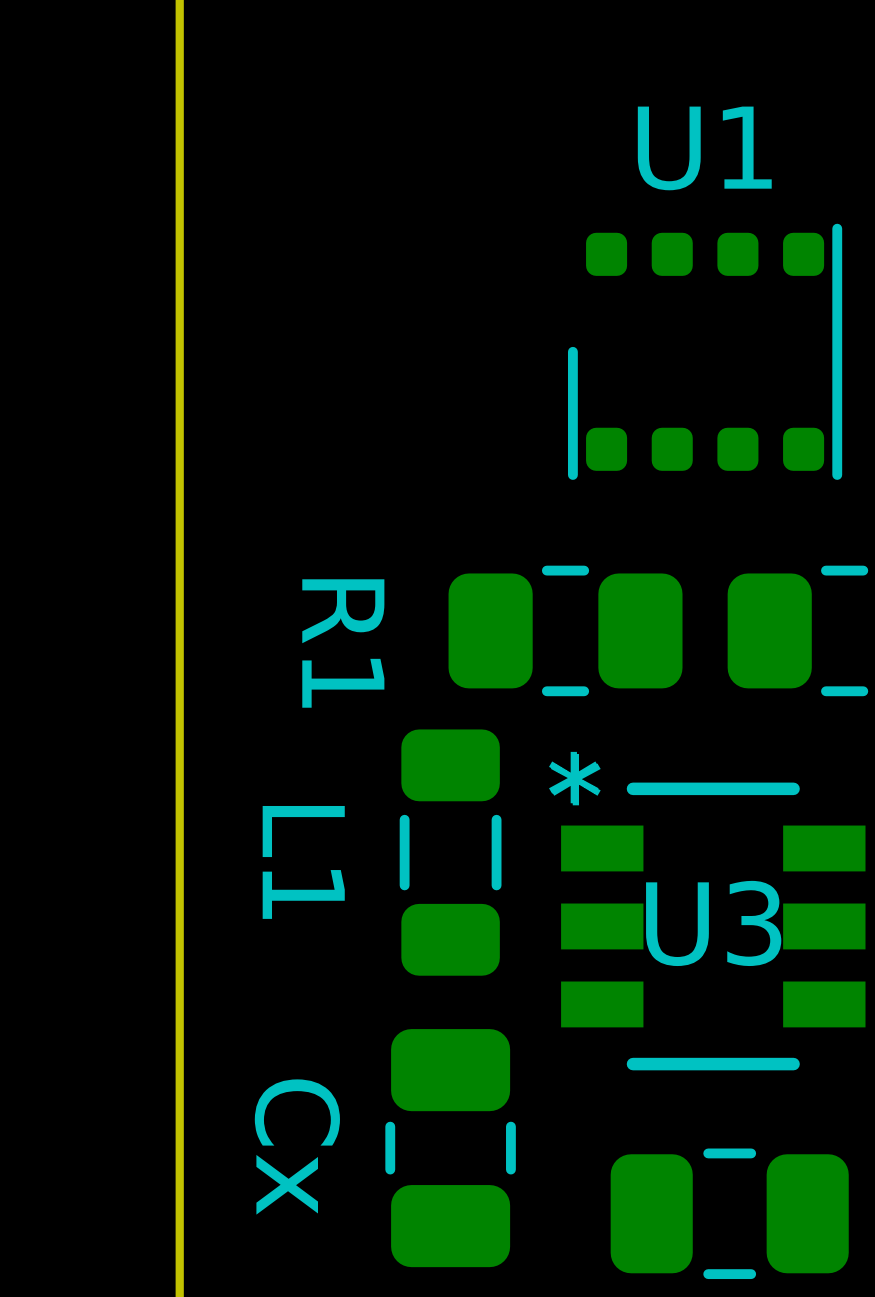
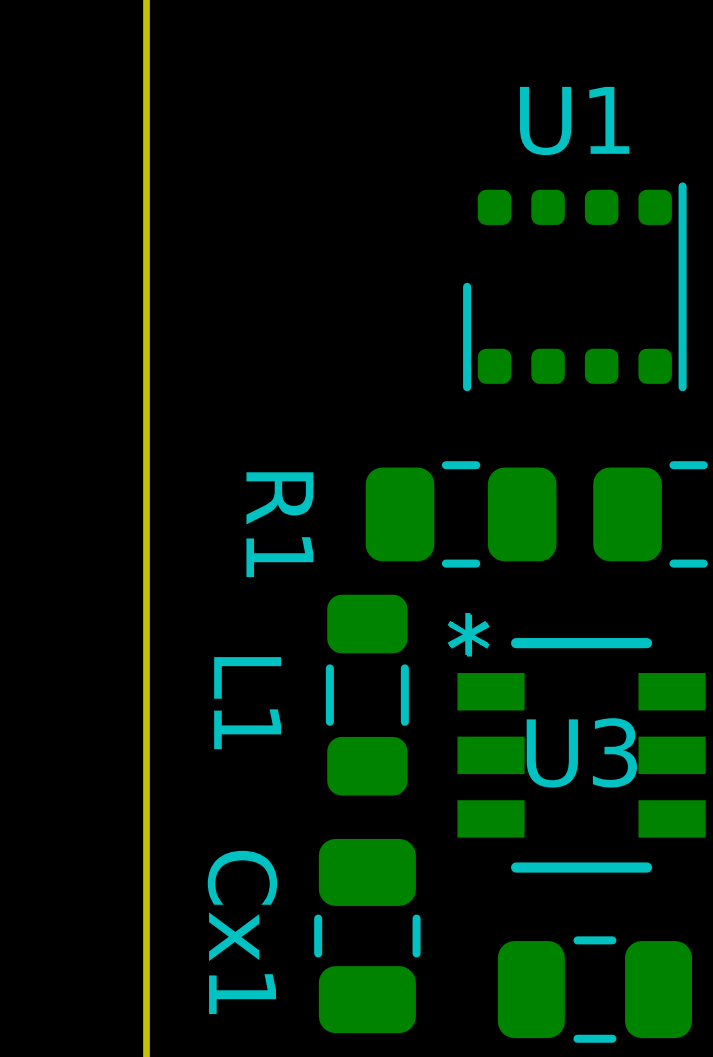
Cx name: Cx (297, 1147) -> Cx1 (242, 932)

